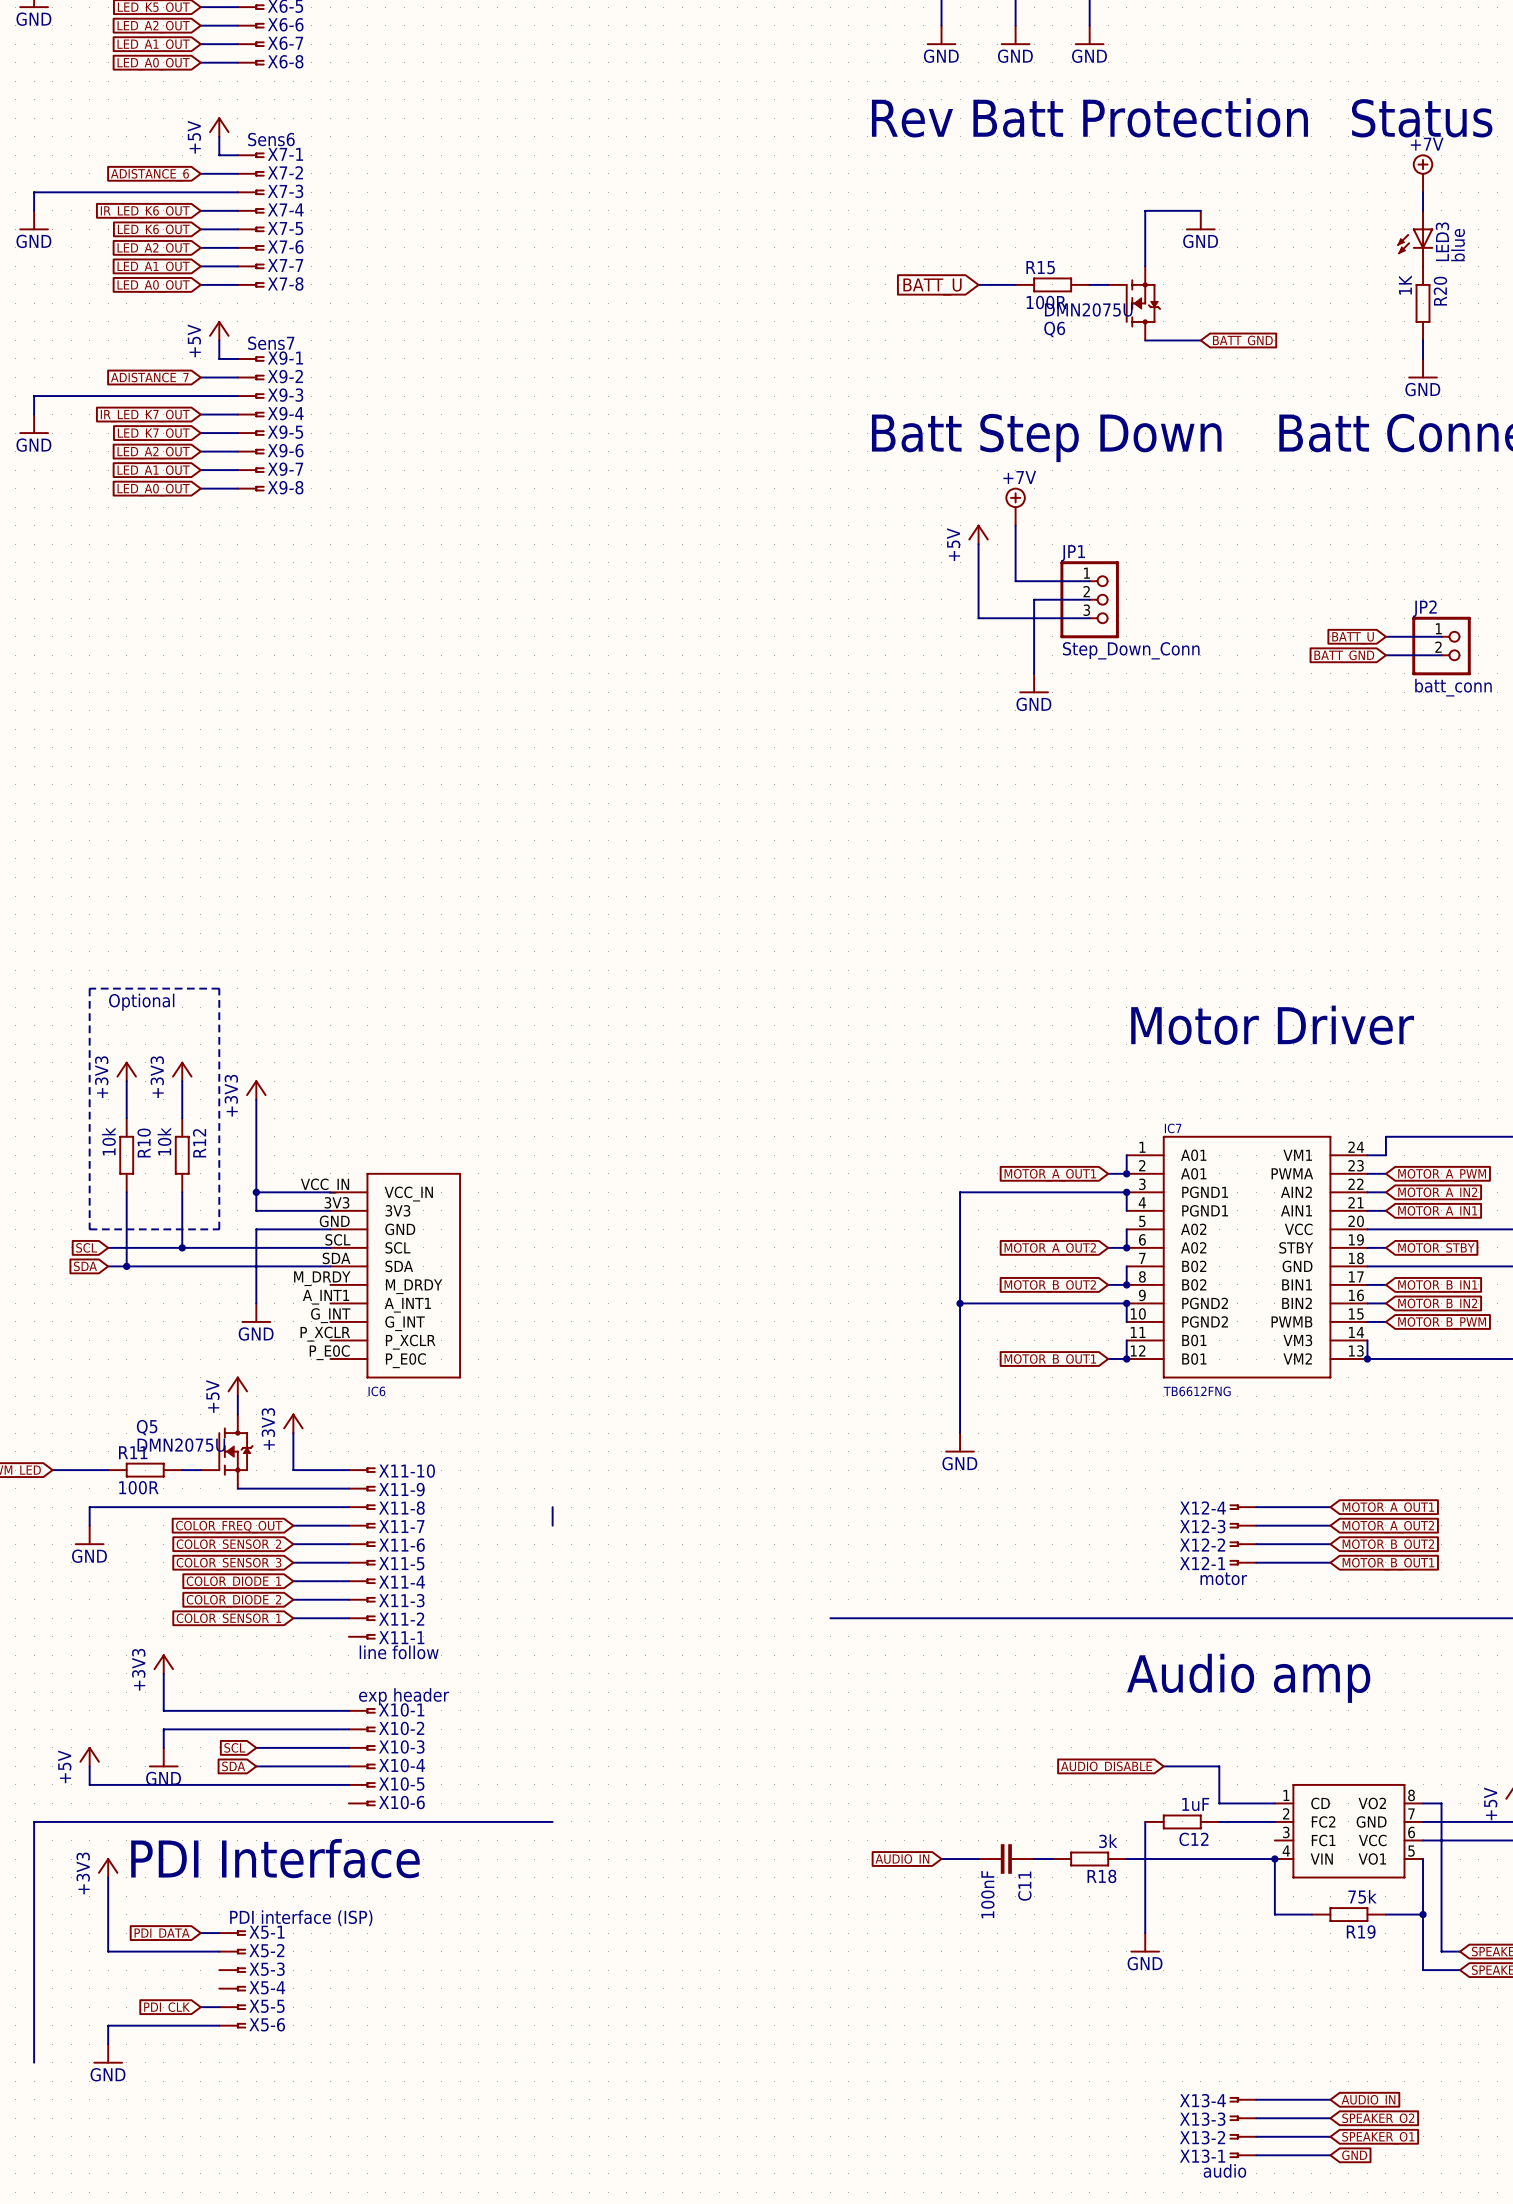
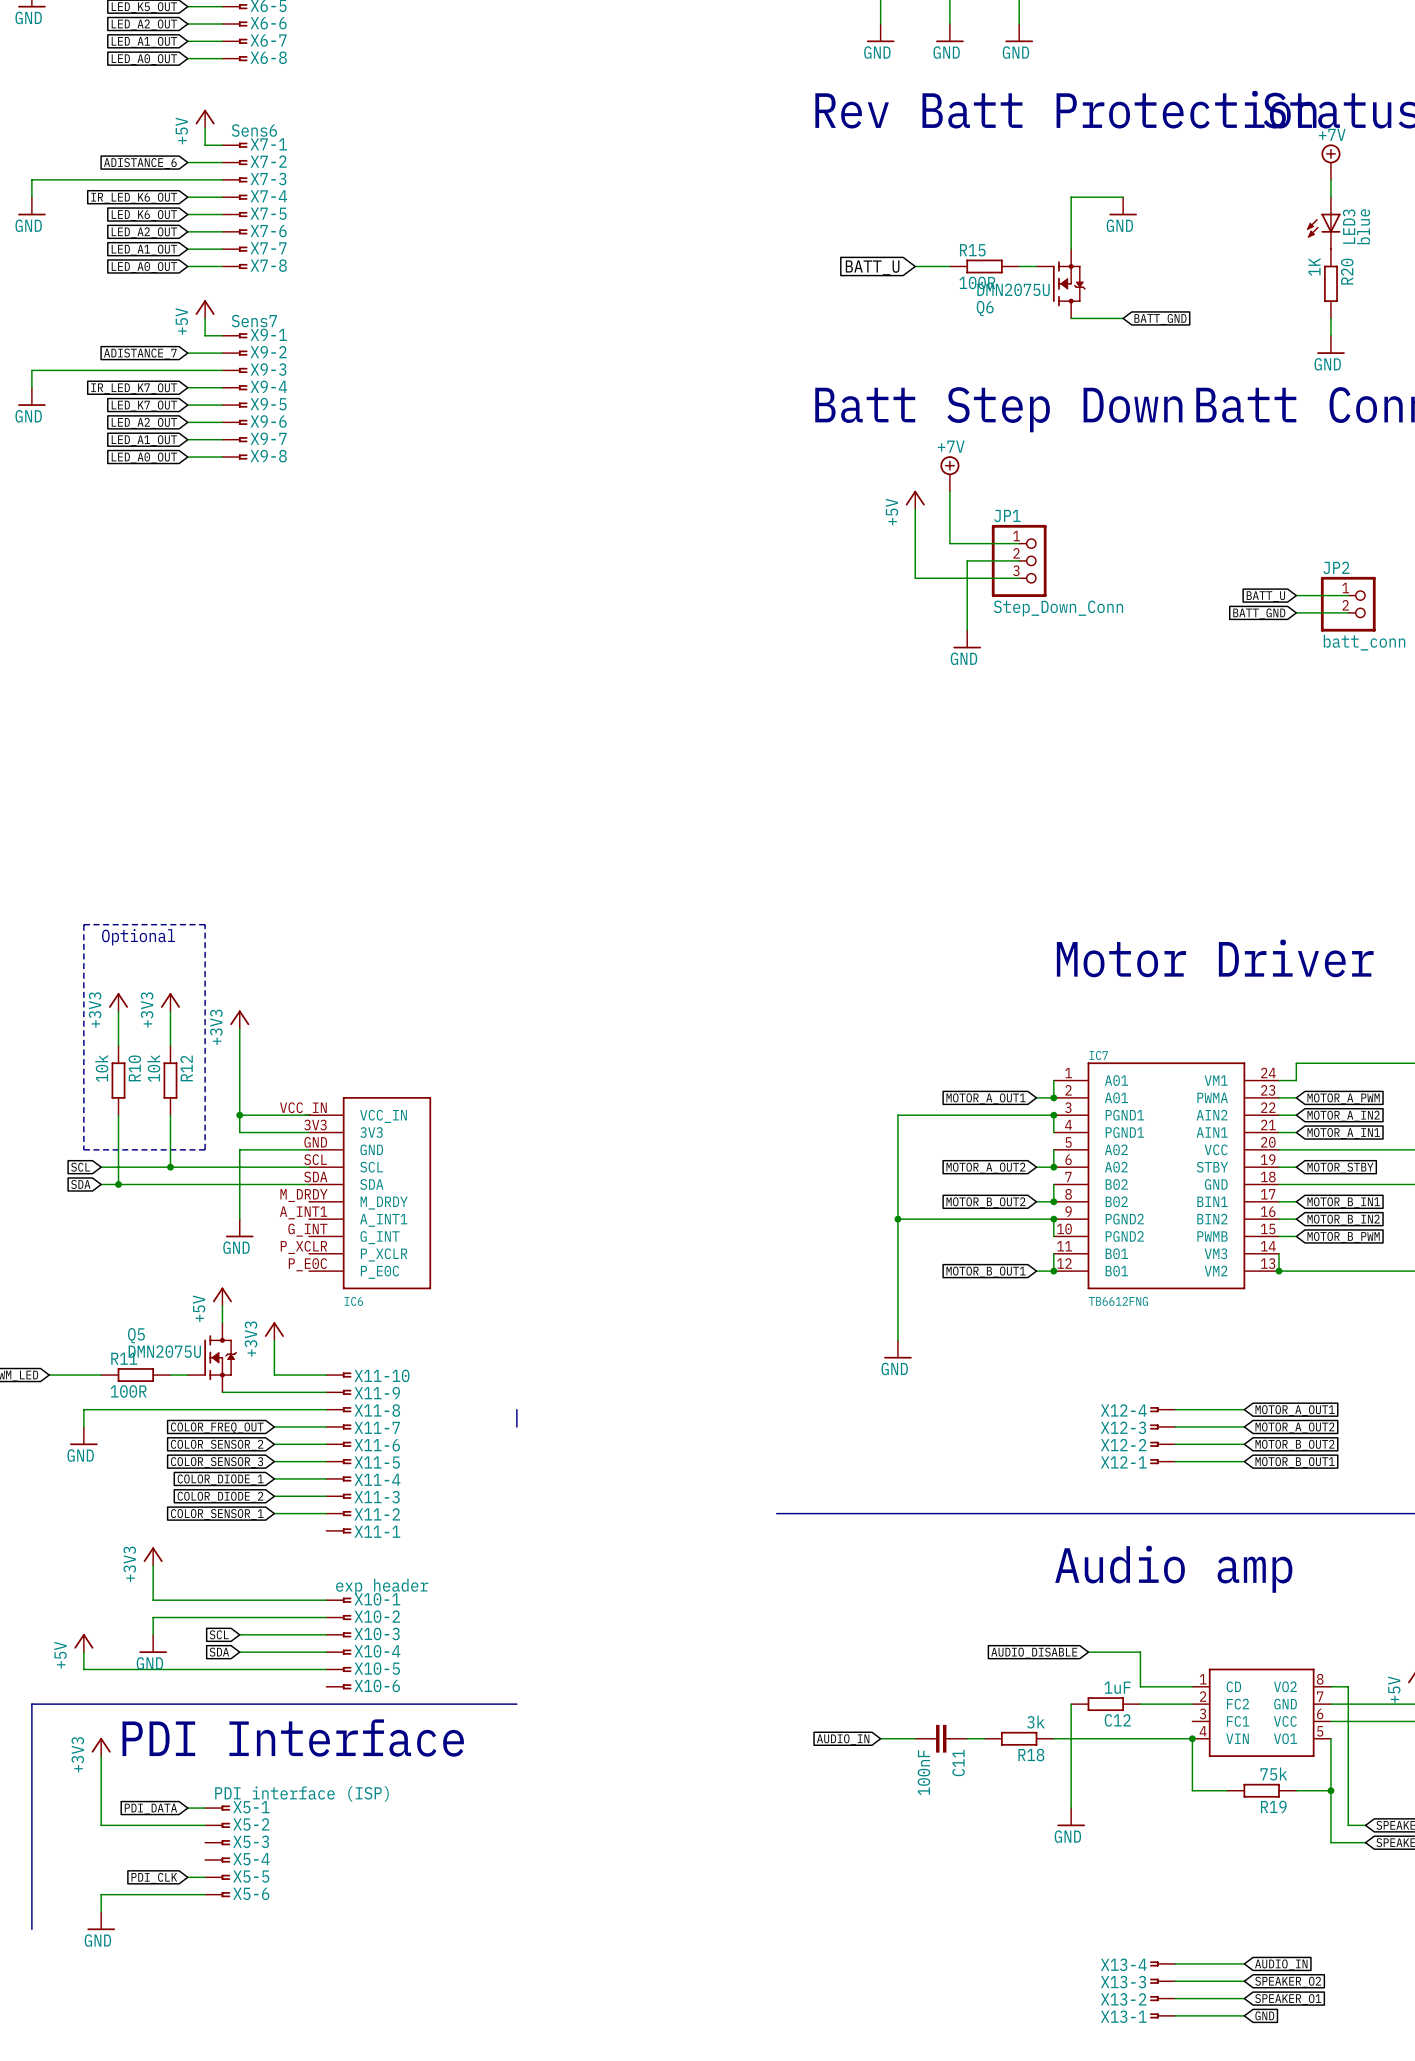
X12-1 value: motor (1223, 1578) -> none
X11-1 value: line follow (399, 1652) -> none
X13-1 value: audio (1224, 2170) -> none

